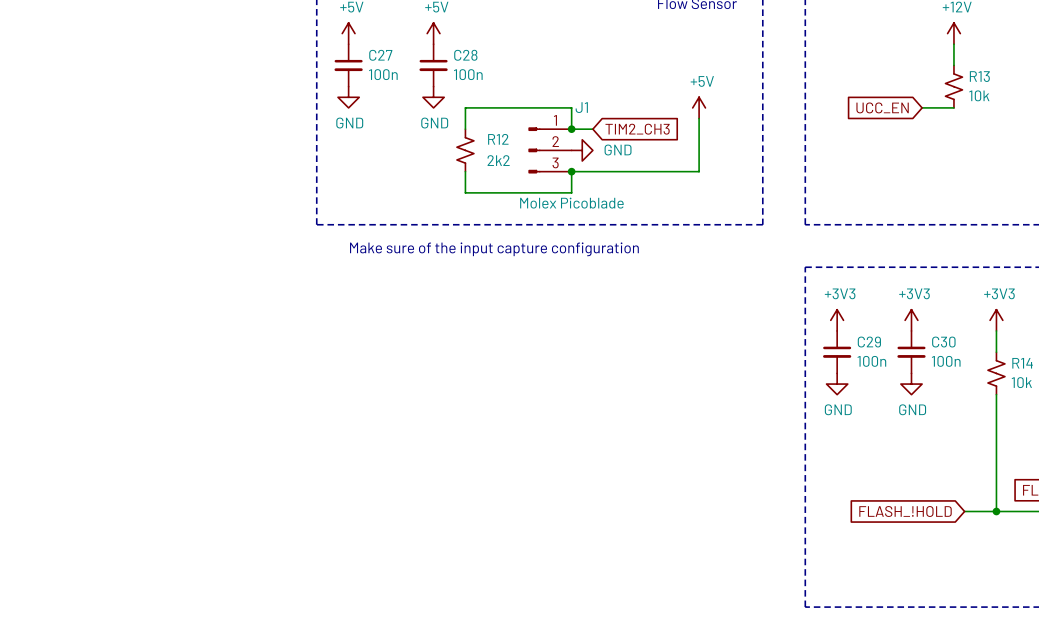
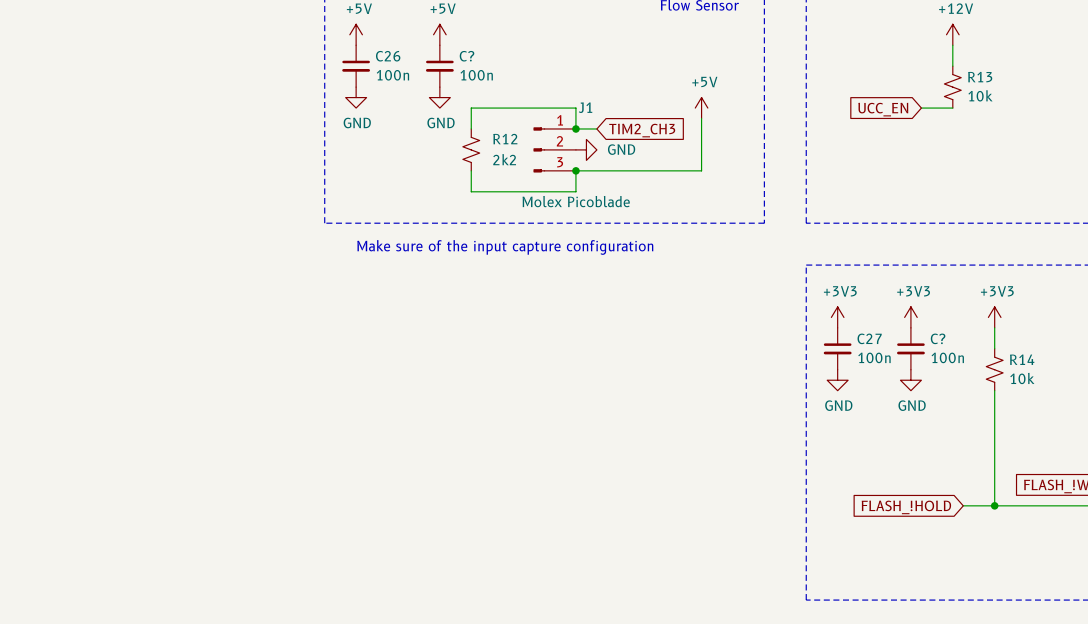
C27 name: C27 (380, 55) -> C26 (388, 56)
C28 name: C28 (465, 55) -> C? (467, 56)
C29 name: C29 (869, 342) -> C27 (869, 338)
C30 name: C30 (943, 342) -> C? (938, 338)

